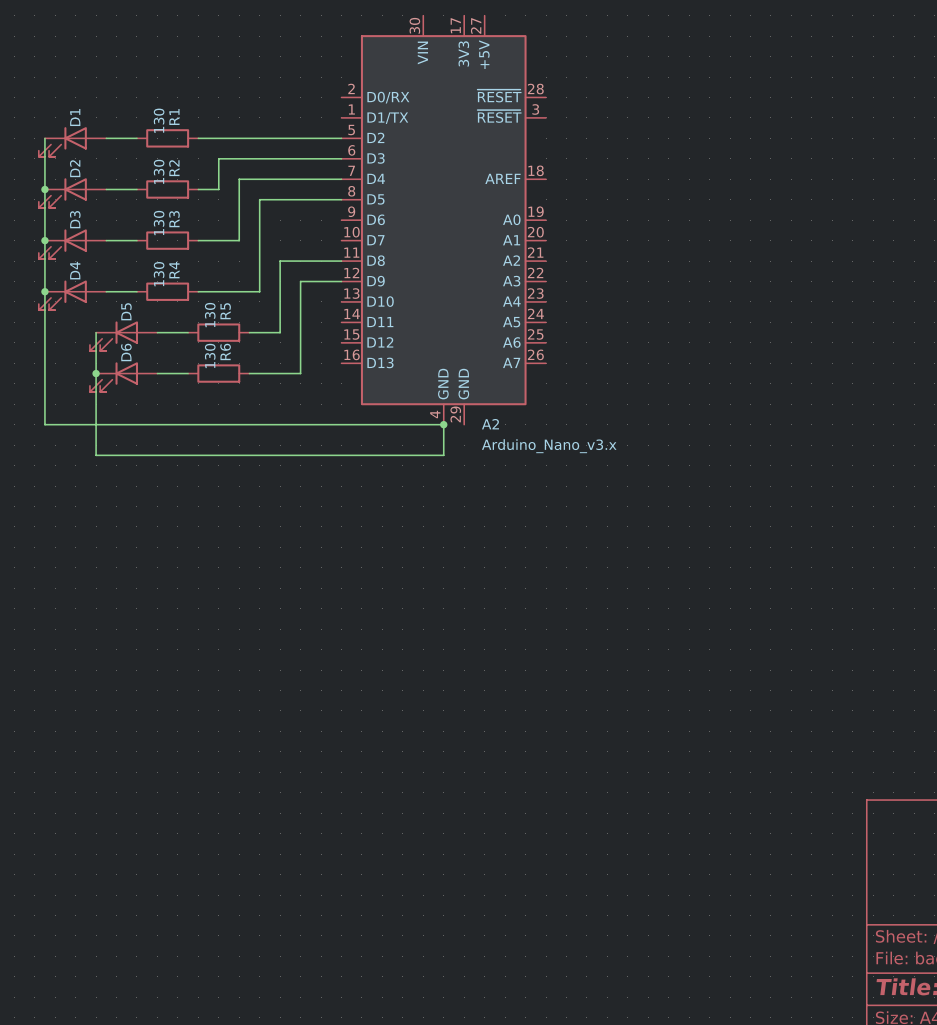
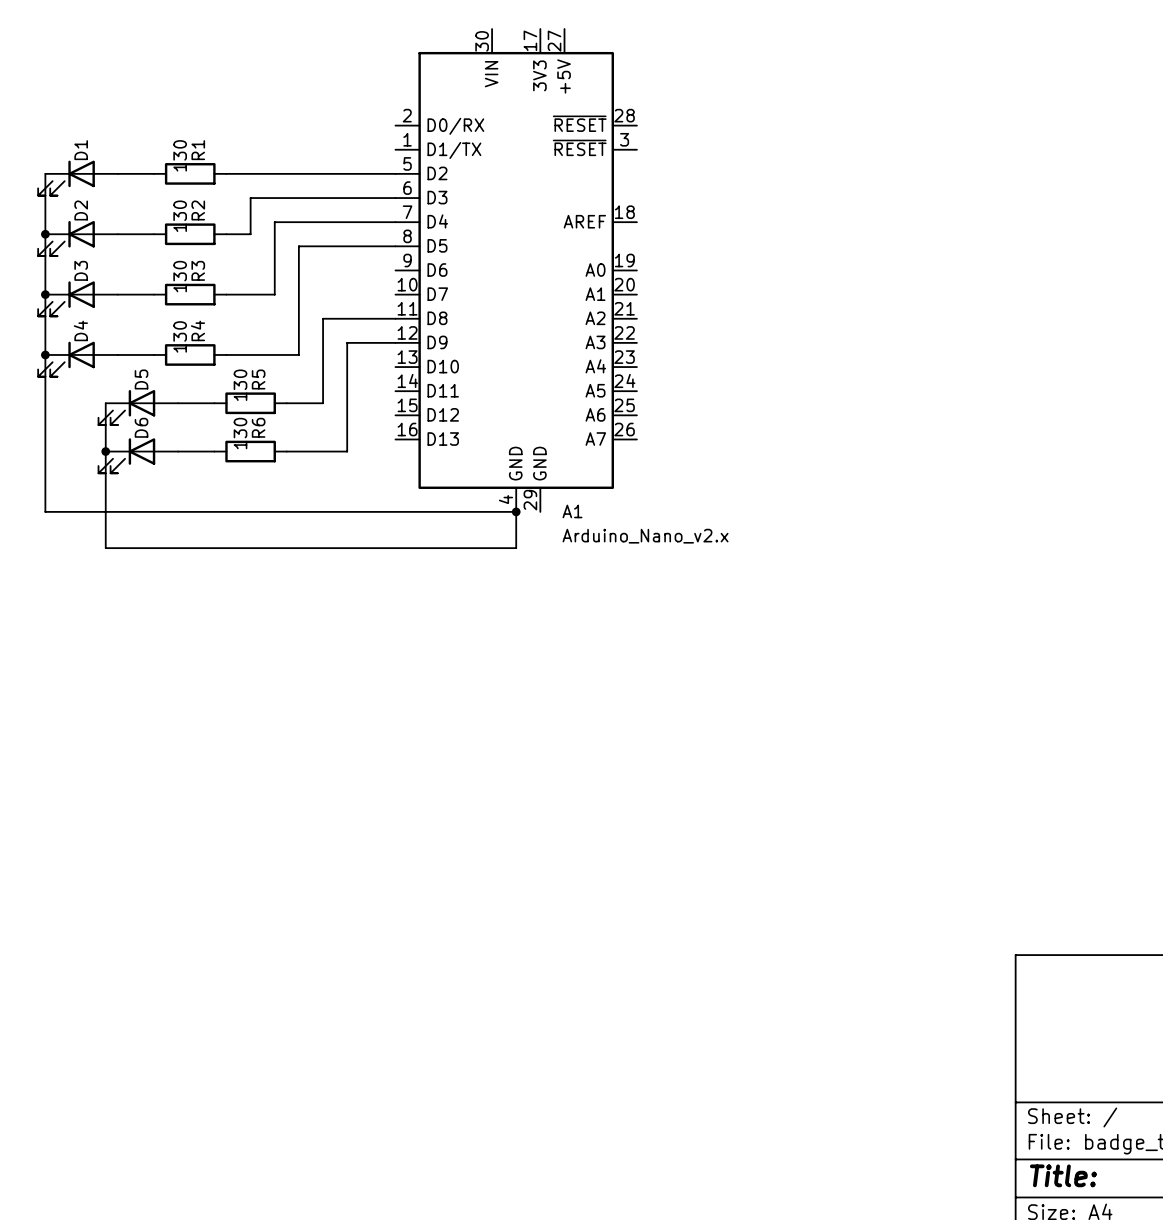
A2 name: A2 (490, 424) -> A1 (572, 511)
A2 value: Arduino_Nano_v3.x (549, 446) -> Arduino_Nano_v2.x (645, 536)

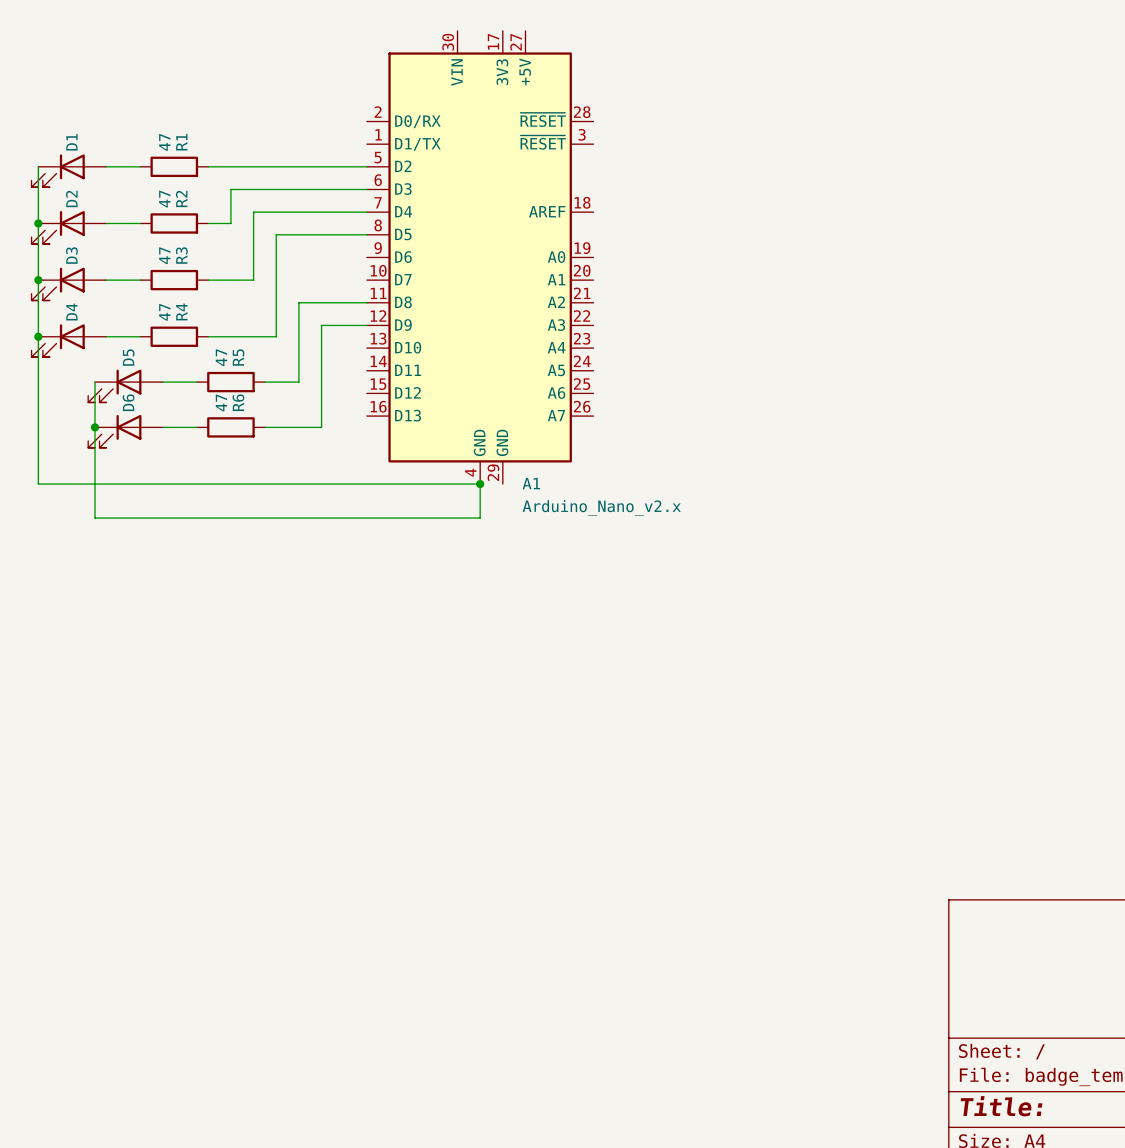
R1 value: 130 (180, 155) -> 47 (164, 142)
R2 value: 130 (180, 216) -> 47 (164, 199)
R3 value: 130 (180, 276) -> 47 (164, 255)
R4 value: 130 (180, 336) -> 47 (164, 312)
R5 value: 130 (240, 385) -> 47 (221, 357)
R6 value: 130 (240, 433) -> 47 (221, 402)

